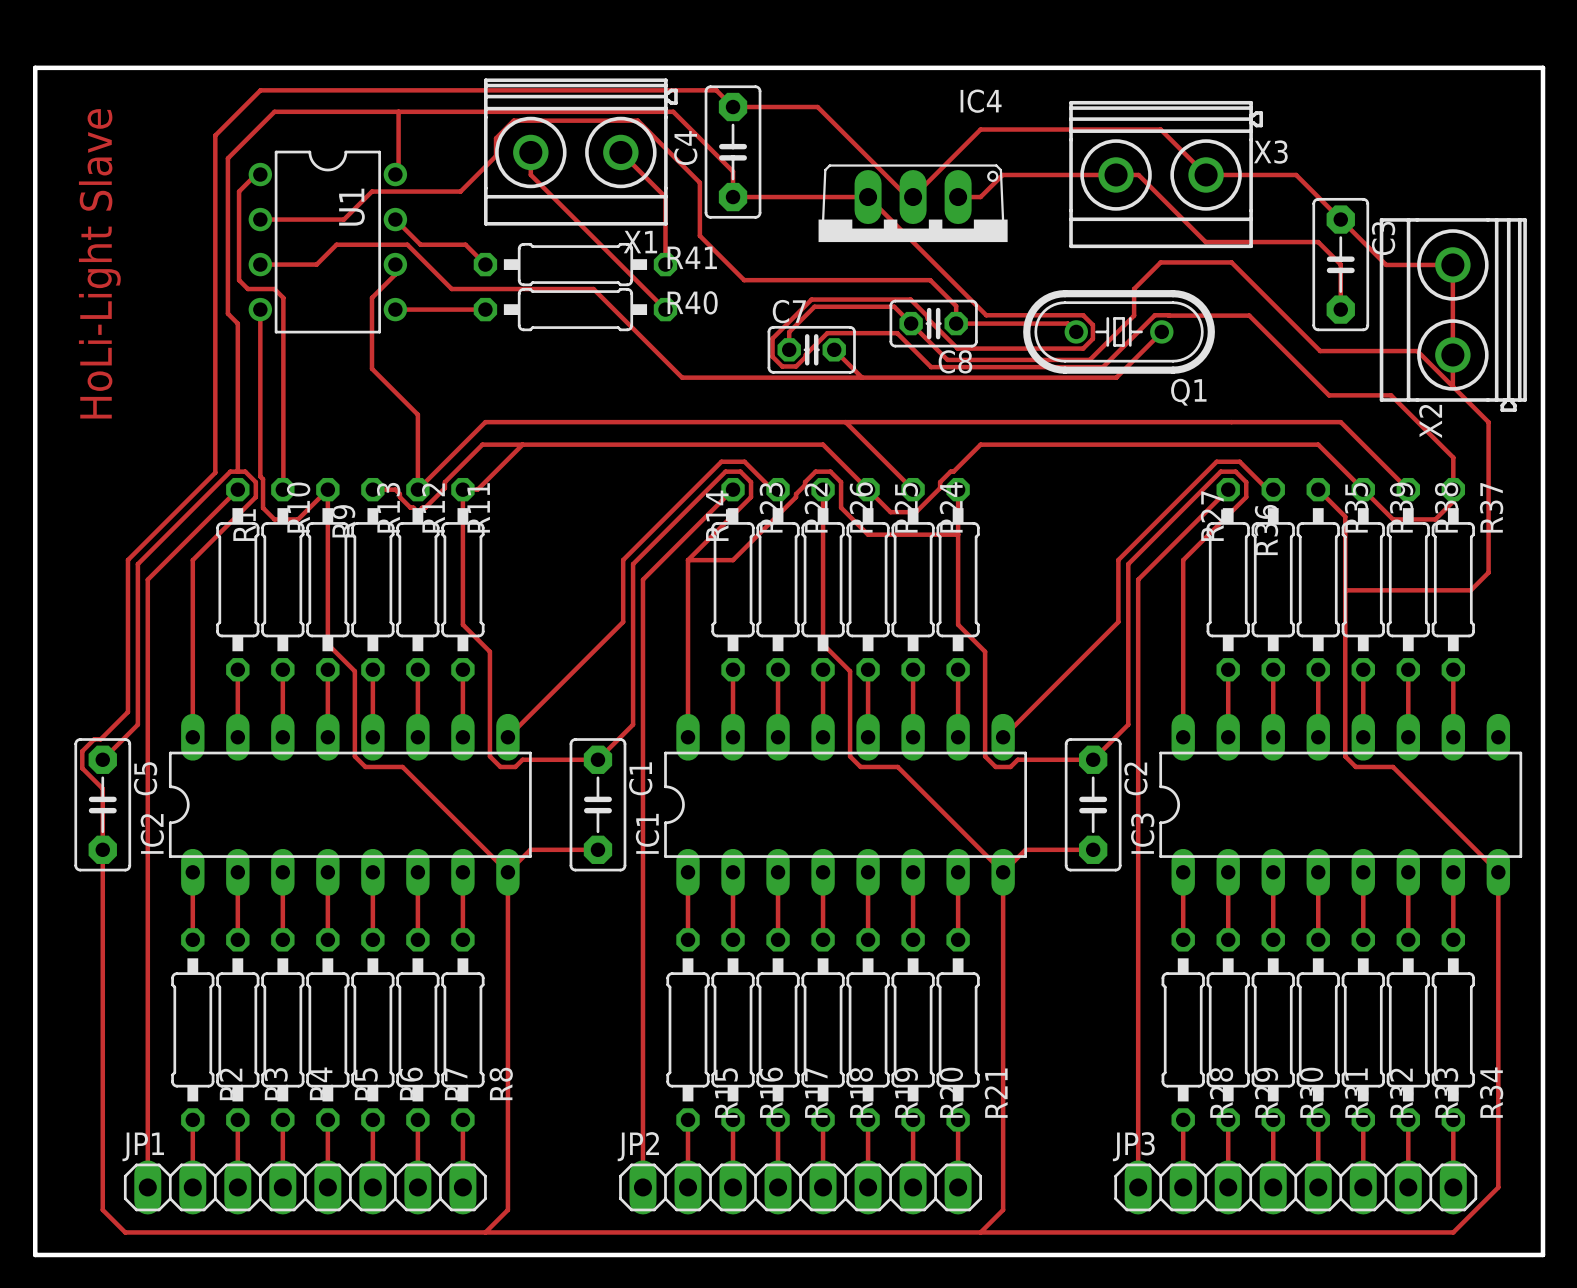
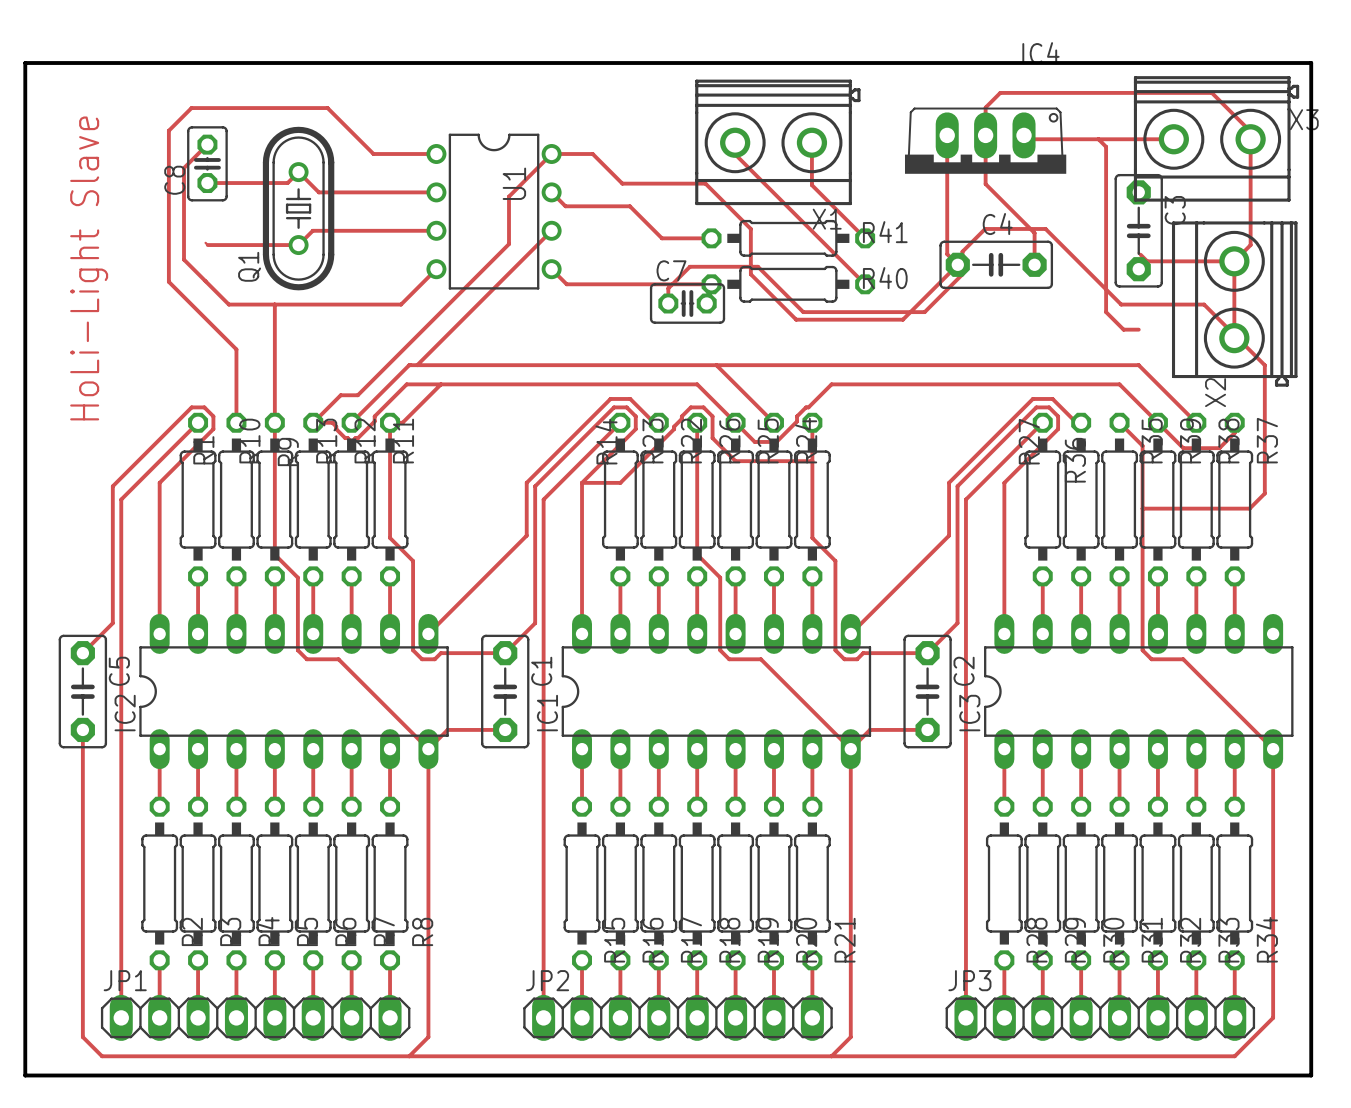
track: (398, 111) (398, 173) (395, 174) -> none
track: (230, 120) (260, 90) (716, 90) (733, 107) (817, 107) (907, 197) (913, 197) (980, 129) (1160, 129) (1206, 174) (1296, 174) (1386, 264) (1452, 264) (1452, 300) -> (191, 108) (327, 108) (373, 154) (436, 154)
track: (215, 135) (215, 472) (127, 560) (127, 712) (100, 739) (94, 739) (82, 751) (82, 768) (102, 788) (102, 849) -> (178, 120) (168, 130) (168, 281) (236, 349) (236, 422)
track: (530, 152) (530, 174) (665, 309) -> none
X1 position: (580, 152) -> (777, 142)
track: (620, 152) (665, 197) (665, 264) -> none
C4 rotation: 0° (733, 152) -> 90° clockwise (996, 264)
C4 position: (733, 152) -> (996, 264)
track: none -> (947, 135) (947, 254) (957, 264) (902, 319) (796, 319) (750, 274) (750, 228) (705, 183) (622, 183) (592, 154) (551, 154)
track: none -> (1024, 135) (1027, 139) (1173, 139)
track: none -> (1098, 139) (1106, 146) (1106, 312) (1123, 329) (1138, 329)
track: none -> (735, 142) (735, 154) (865, 284)
track: none -> (811, 142) (811, 185) (865, 238)
track: none -> (207, 144) (184, 168) (184, 259) (228, 304) (401, 304) (436, 269)
track: (260, 174) (256, 174) (239, 191) (239, 280) (247, 289) (274, 289) (283, 297) (283, 489) -> none
track: none -> (551, 154) (509, 196) (509, 244) (357, 395) (340, 395) (313, 422) (330, 422)
X3 position: (1166, 174) -> (1216, 138)
track: (958, 197) (980, 197) (1002, 174) (1138, 174) (1205, 242) (1318, 242) (1340, 264) (1340, 309) -> none
IC4 position: (913, 203) -> (985, 140)
track: none -> (207, 183) (287, 183) (298, 172) (318, 192) (436, 192)
track: (260, 219) (343, 219) (371, 191) (460, 191) (496, 156) (496, 138) (513, 120) (637, 120) (699, 182) (699, 235) (744, 280) (930, 280) (956, 306) (956, 323) (1067, 323) (1076, 331) -> none
track: (395, 219) (420, 244) (465, 244) (485, 264) -> none
track: none -> (551, 192) (565, 206) (629, 206) (661, 238) (711, 238)
U1 position: (327, 242) -> (494, 211)
text position: HoLi-Light Slave (99, 263) -> HoLi-Light Slave (89, 268)
track: (260, 264) (316, 264) (336, 244) (407, 244) (451, 289) (593, 289) (682, 377) (1116, 377) (1161, 332) -> none
track: (395, 264) (395, 274) (371, 297) (371, 368) (417, 414) (417, 489) -> none
track: none -> (436, 230) (312, 230) (298, 245) (207, 245) (205, 242)
R41 position: (575, 264) -> (788, 238)
track: none -> (551, 230) (417, 365)
track: none -> (1138, 252) (1147, 261) (1234, 261) (1250, 245) (1250, 131) (1211, 92) (1000, 92) (985, 107) (985, 184) (1034, 233) (1034, 264)
track: (260, 309) (260, 476) (263, 479) (263, 507) (274, 519) (298, 519) (327, 489) -> (274, 304) (274, 422)
track: (395, 309) (485, 309) -> none
R40 position: (575, 309) -> (788, 284)
track: none -> (551, 269) (566, 284) (711, 284)
X2 position: (1453, 315) -> (1234, 304)
C8 rotation: 0° (933, 323) -> 90° clockwise (207, 163)
C8 position: (933, 323) -> (207, 163)
Q1 rotation: 0° (1119, 331) -> 90° clockwise (298, 208)
Q1 position: (1119, 331) -> (298, 208)
track: (834, 349) (862, 377) -> none
track: (237, 471) (237, 323) (227, 313) (227, 158) (274, 111) (673, 111) (733, 171) (733, 197) (868, 197) (986, 315) (1083, 315) (1092, 325) (1092, 338) (1083, 348) (957, 348) (910, 299) (811, 299) (772, 338) (772, 356) (782, 366) (796, 366) (827, 333) (897, 333) (931, 367) (1103, 367) (1154, 315) (1249, 315) (1329, 395) (1391, 395) (1453, 457) (1453, 489) -> none

